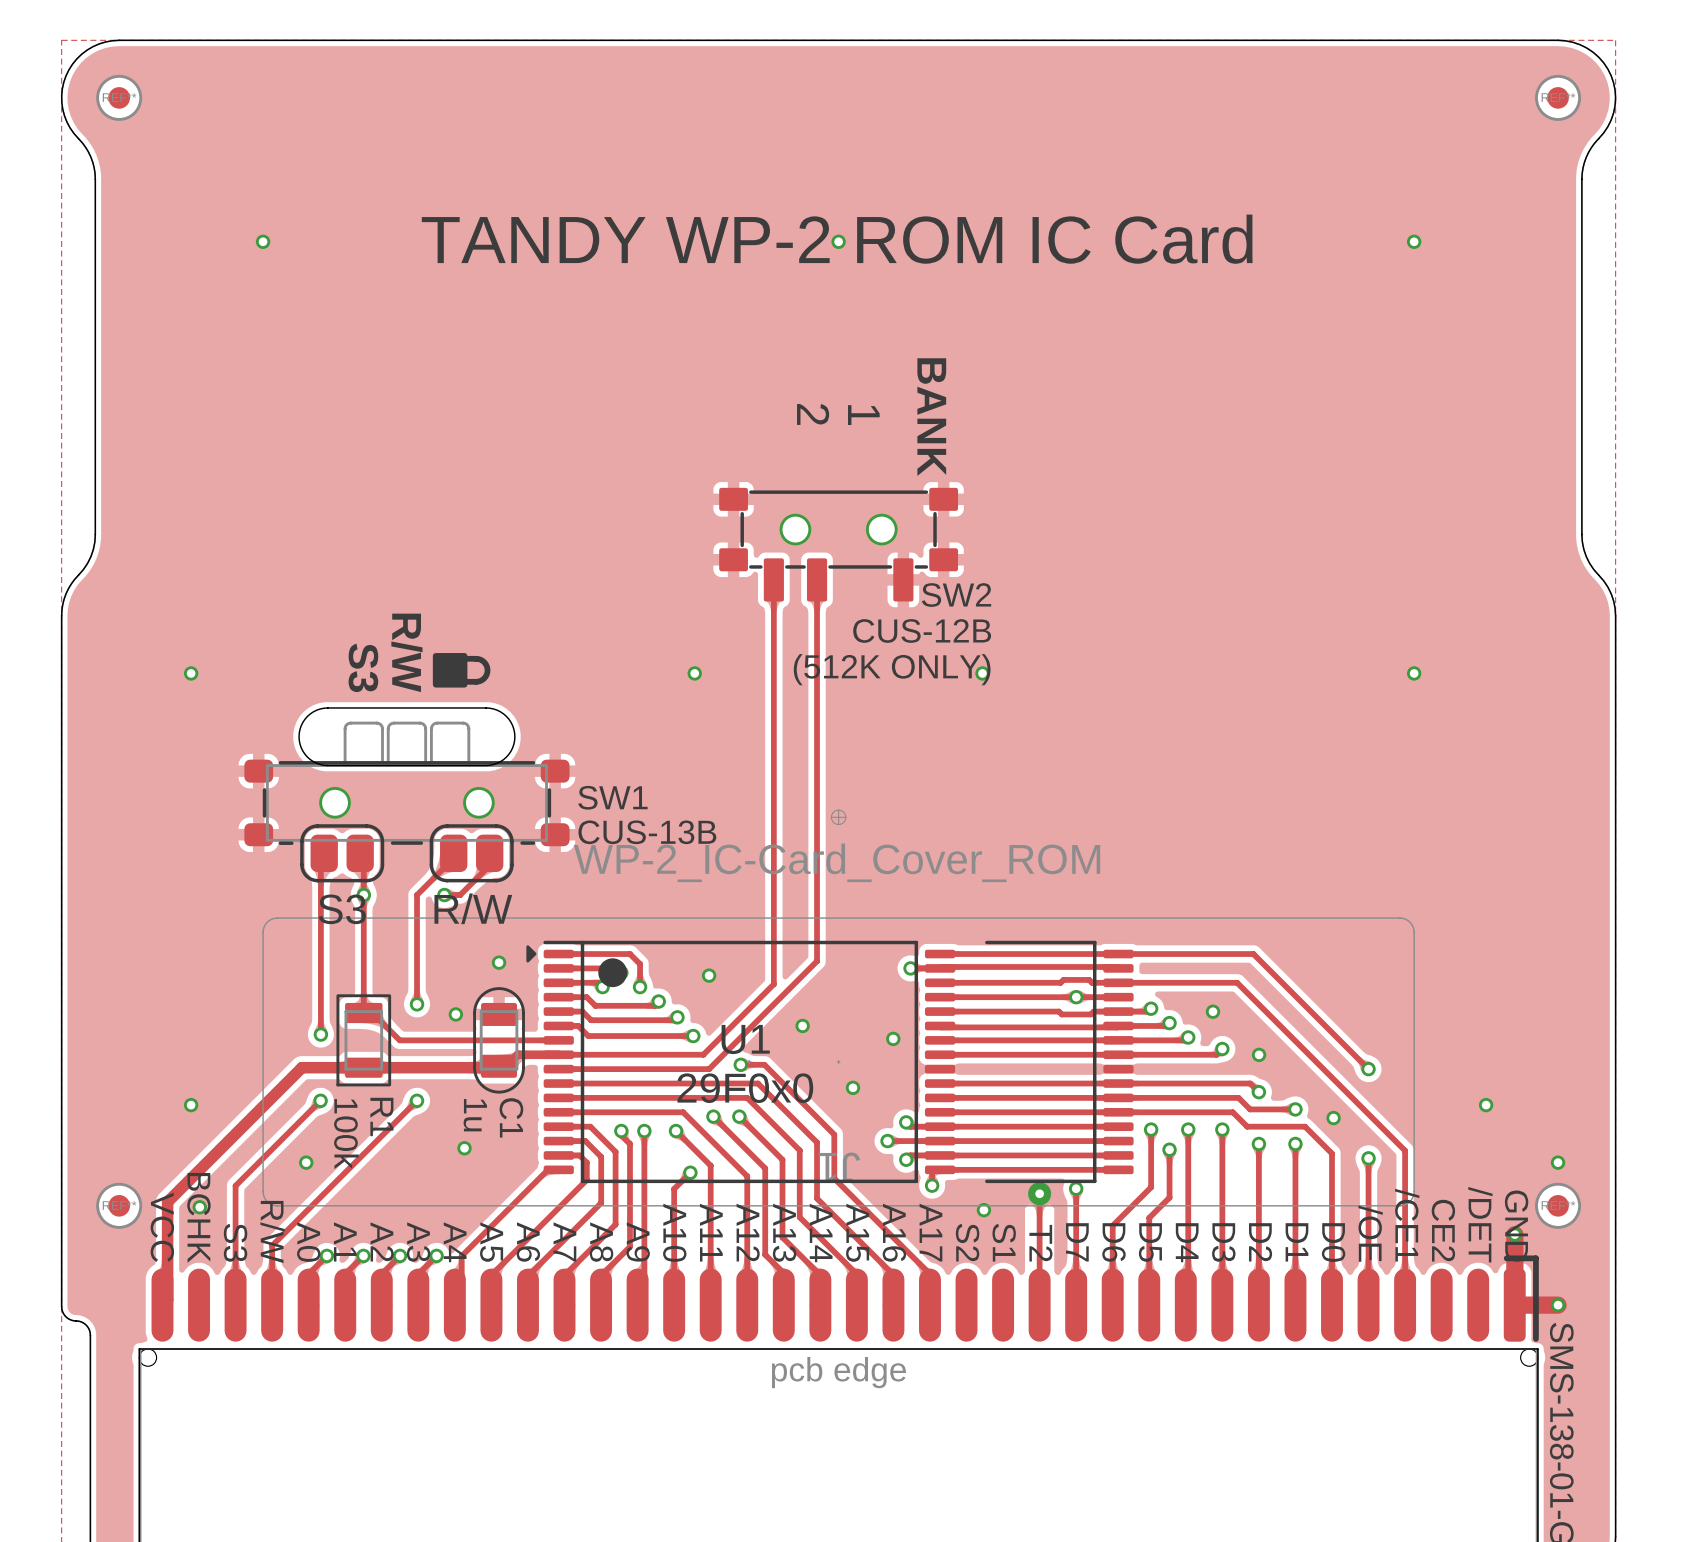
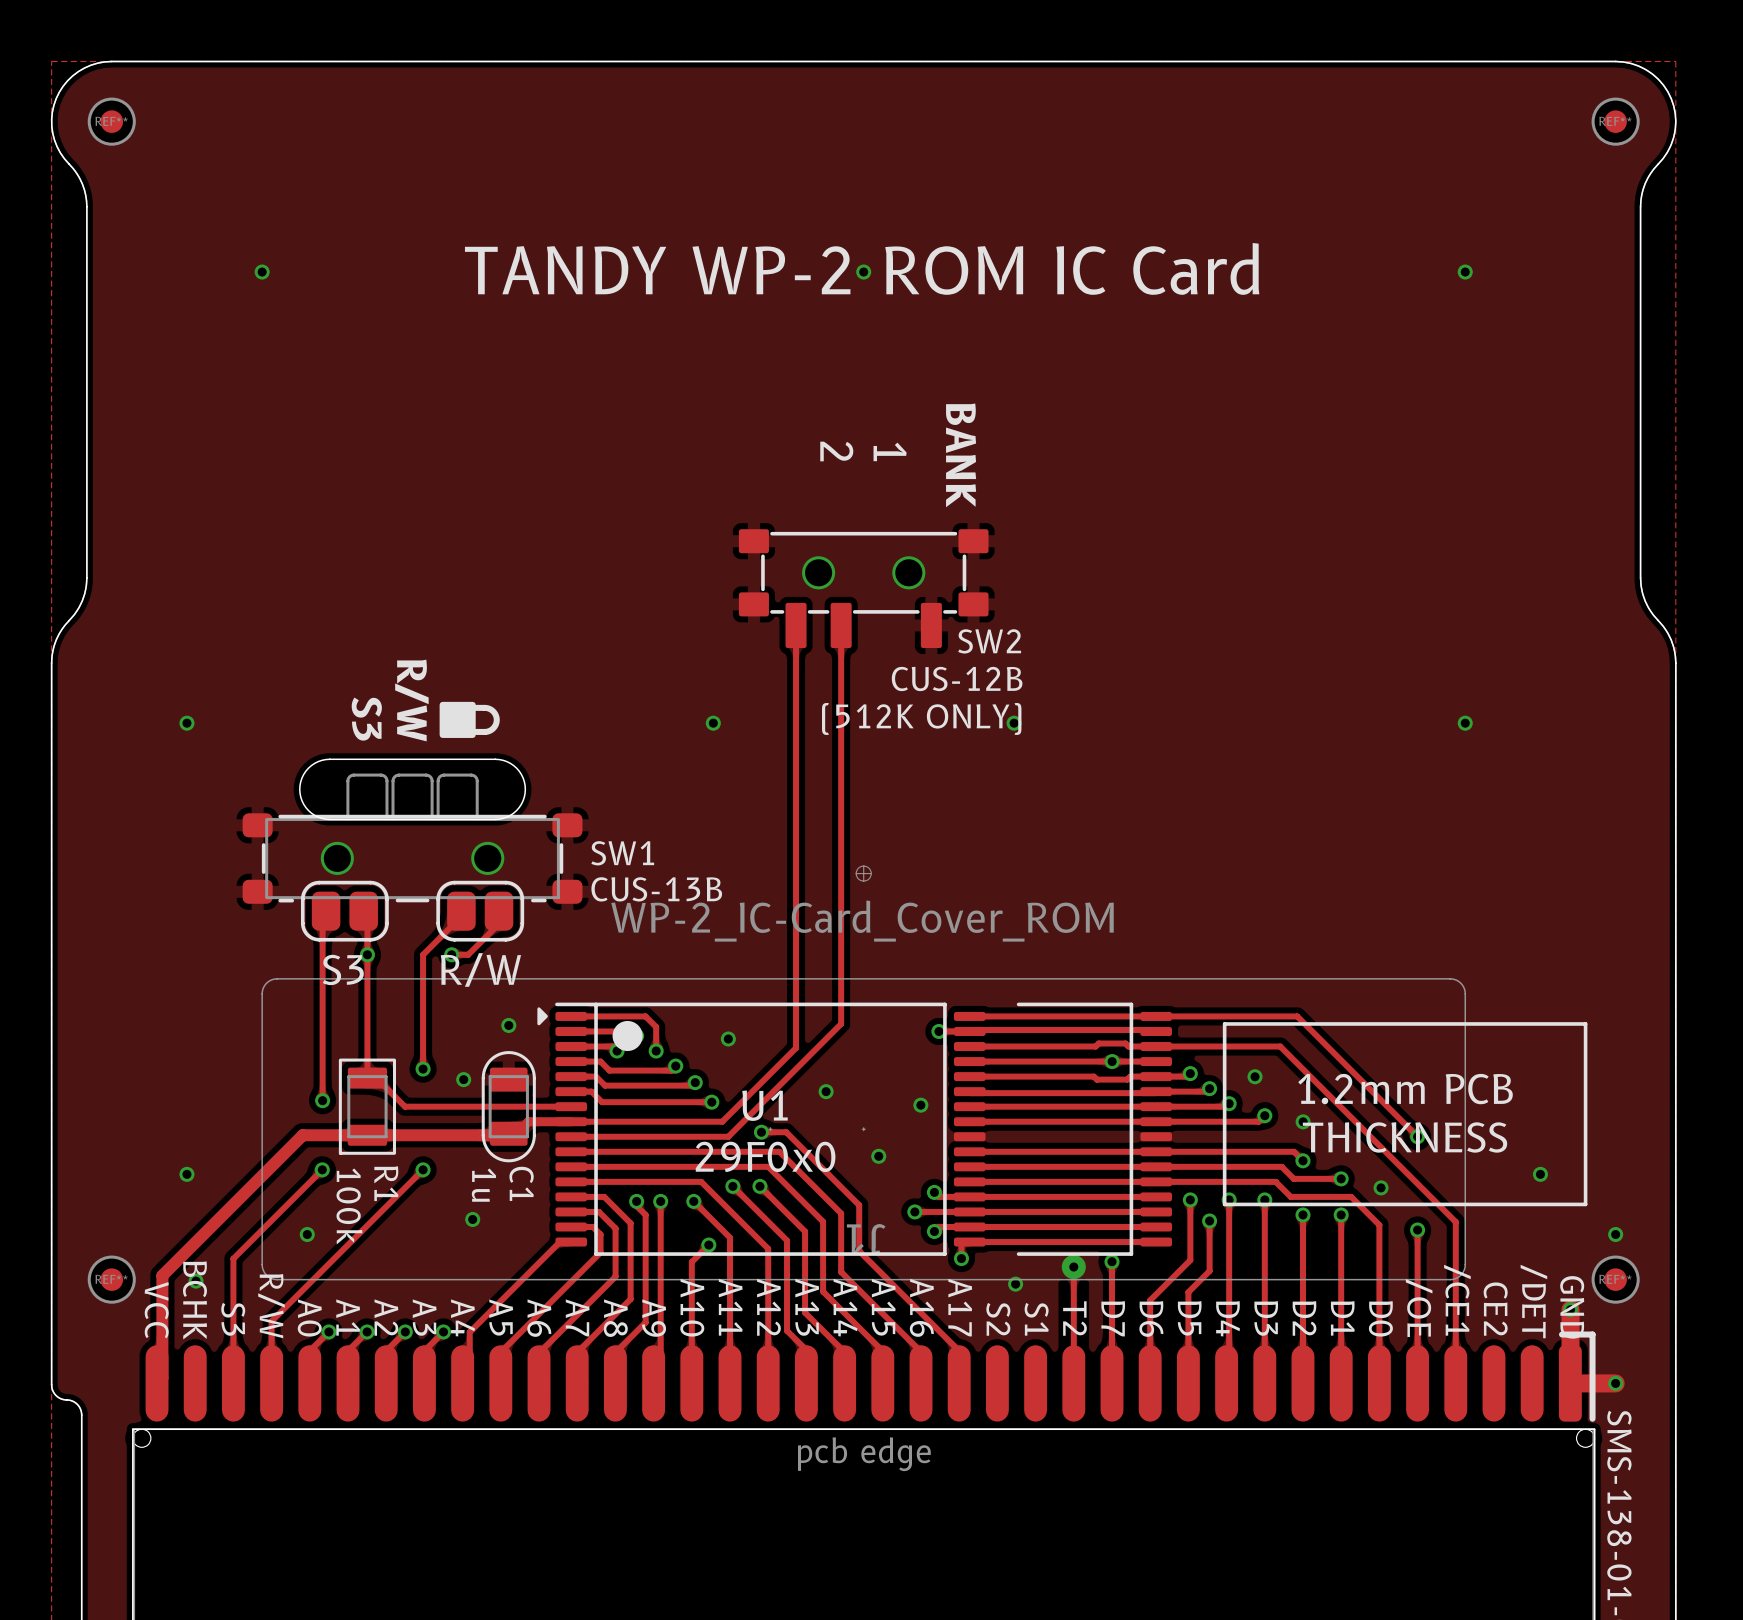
line: none -> (1224, 1023) (1585, 1023) (1585, 1204) (1224, 1204) (1224, 1023)
text: none -> 1.2mm PCB (1405, 1089)
text: none -> THICKNESS (1405, 1137)

